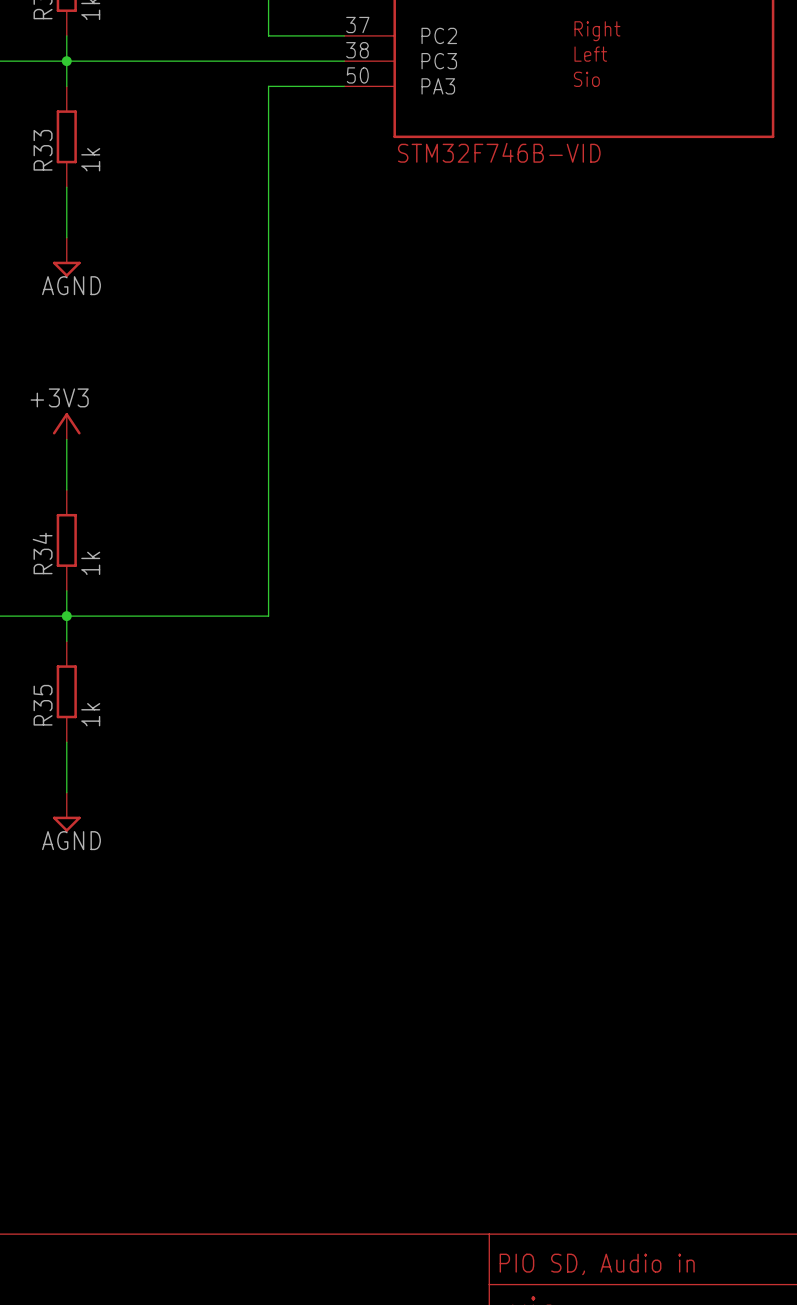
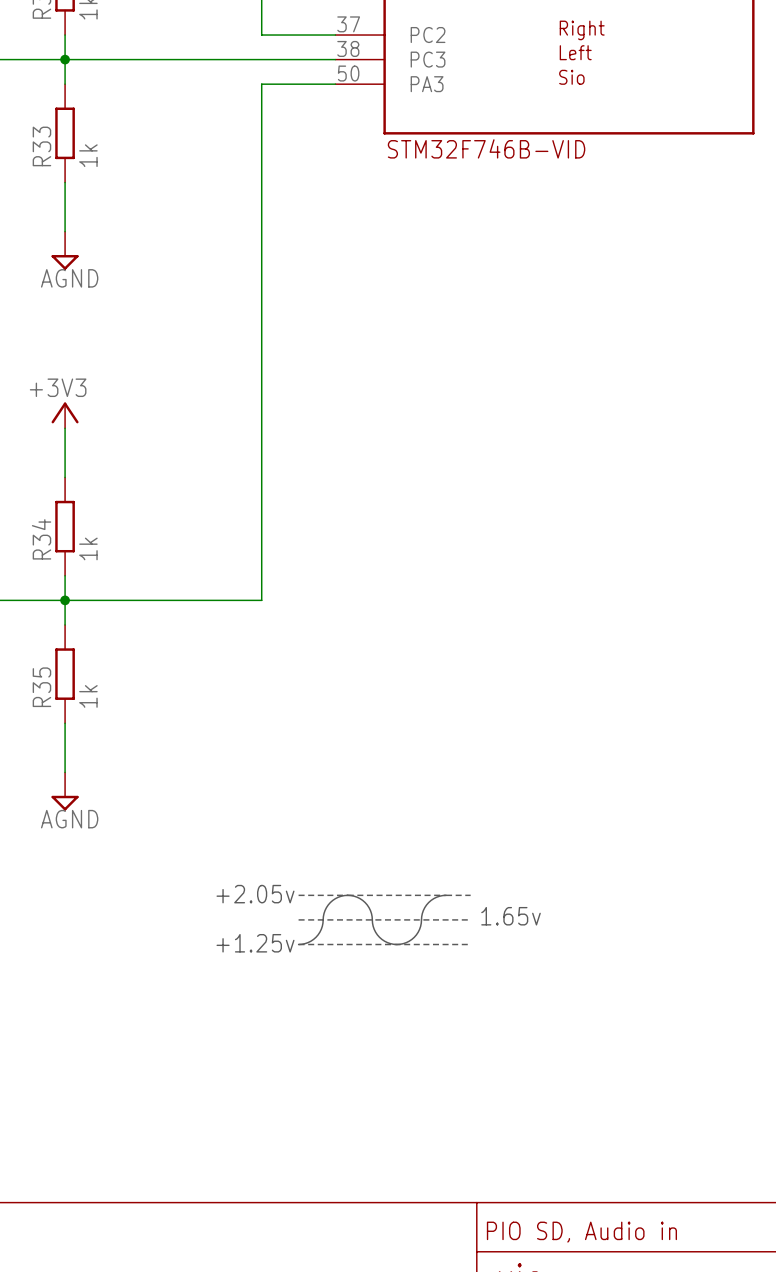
text: none -> +2.05v (255, 894)
line: none -> (298, 895) (470, 895)
line: none -> (446, 895) (436, 897) (428, 902) (423, 910) (418, 932) (411, 939) (403, 943) (390, 943) (381, 939) (374, 929) (371, 913) (367, 904) (357, 897) (347, 895) (338, 897) (330, 902) (325, 910) (322, 926) (318, 934) (307, 942) (298, 944) (470, 944)
text: none -> 1.65v (511, 916)
line: none -> (298, 919) (470, 919)
text: none -> +1.25v (255, 943)

